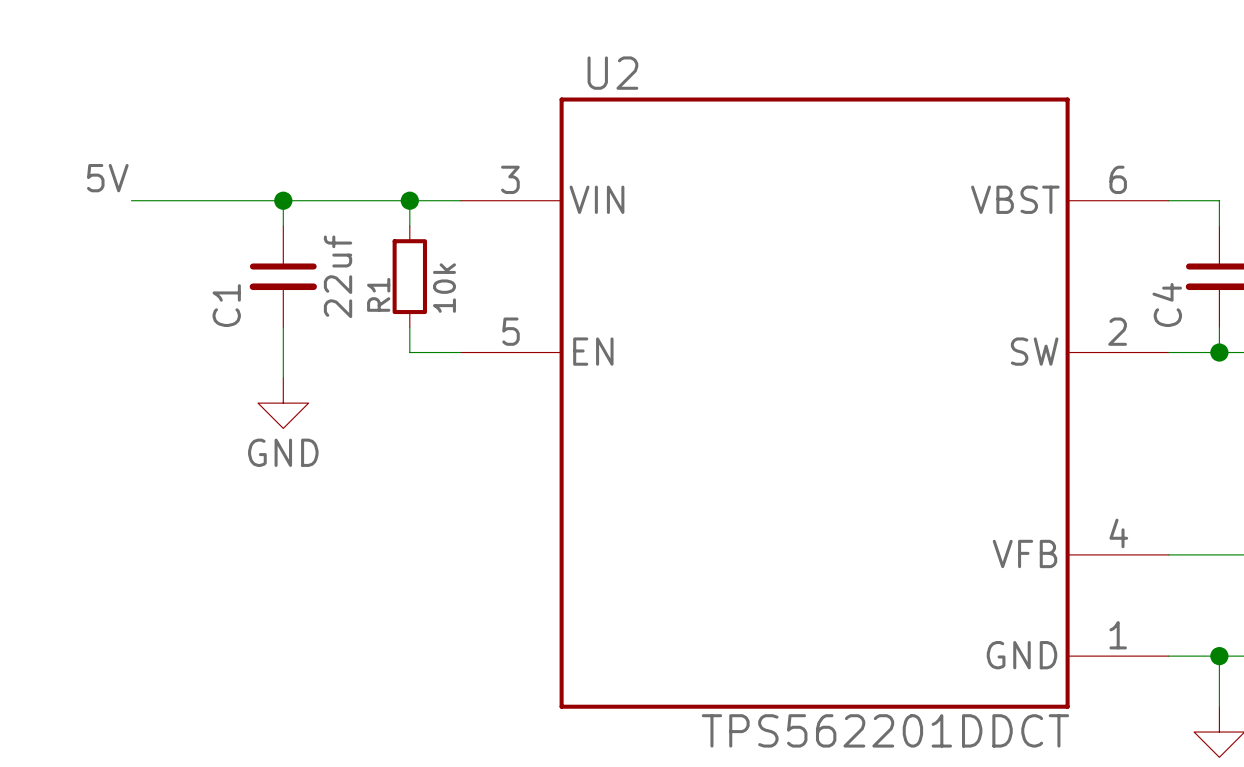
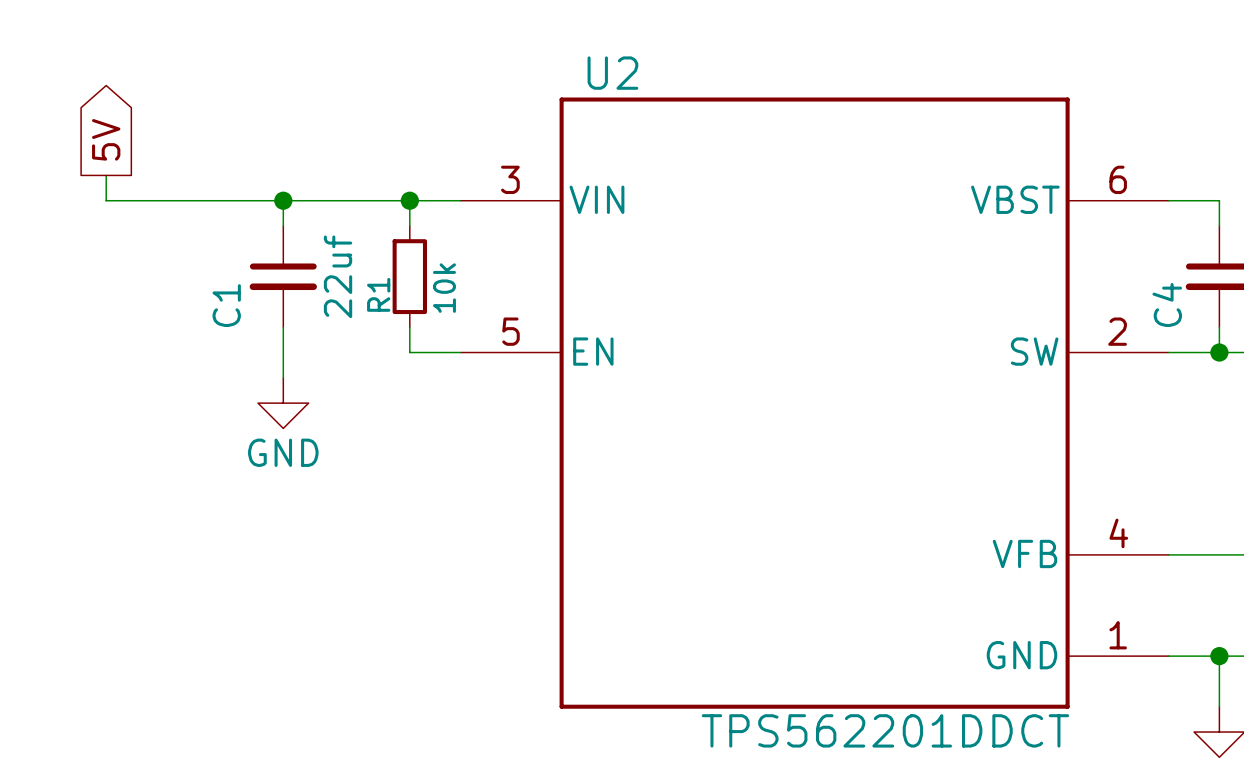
global label: none -> 5V (106, 139)
wire: none -> (106, 175) (106, 200) (131, 200)
label: 5V (107, 178) -> none

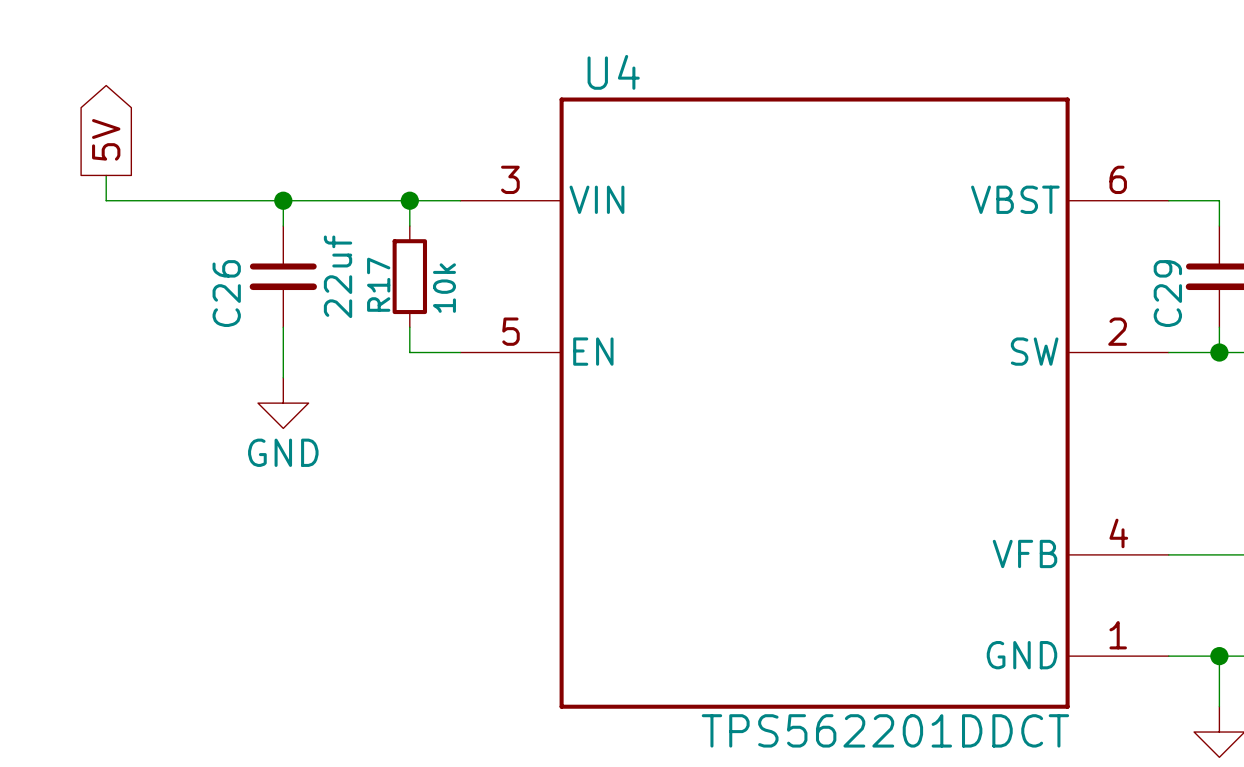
U2 name: U2 (612, 73) -> U4 (613, 72)
R1 name: R1 (378, 294) -> R17 (378, 284)
C4 name: C4 (1167, 304) -> C29 (1167, 293)
C1 name: C1 (226, 305) -> C26 (226, 293)

